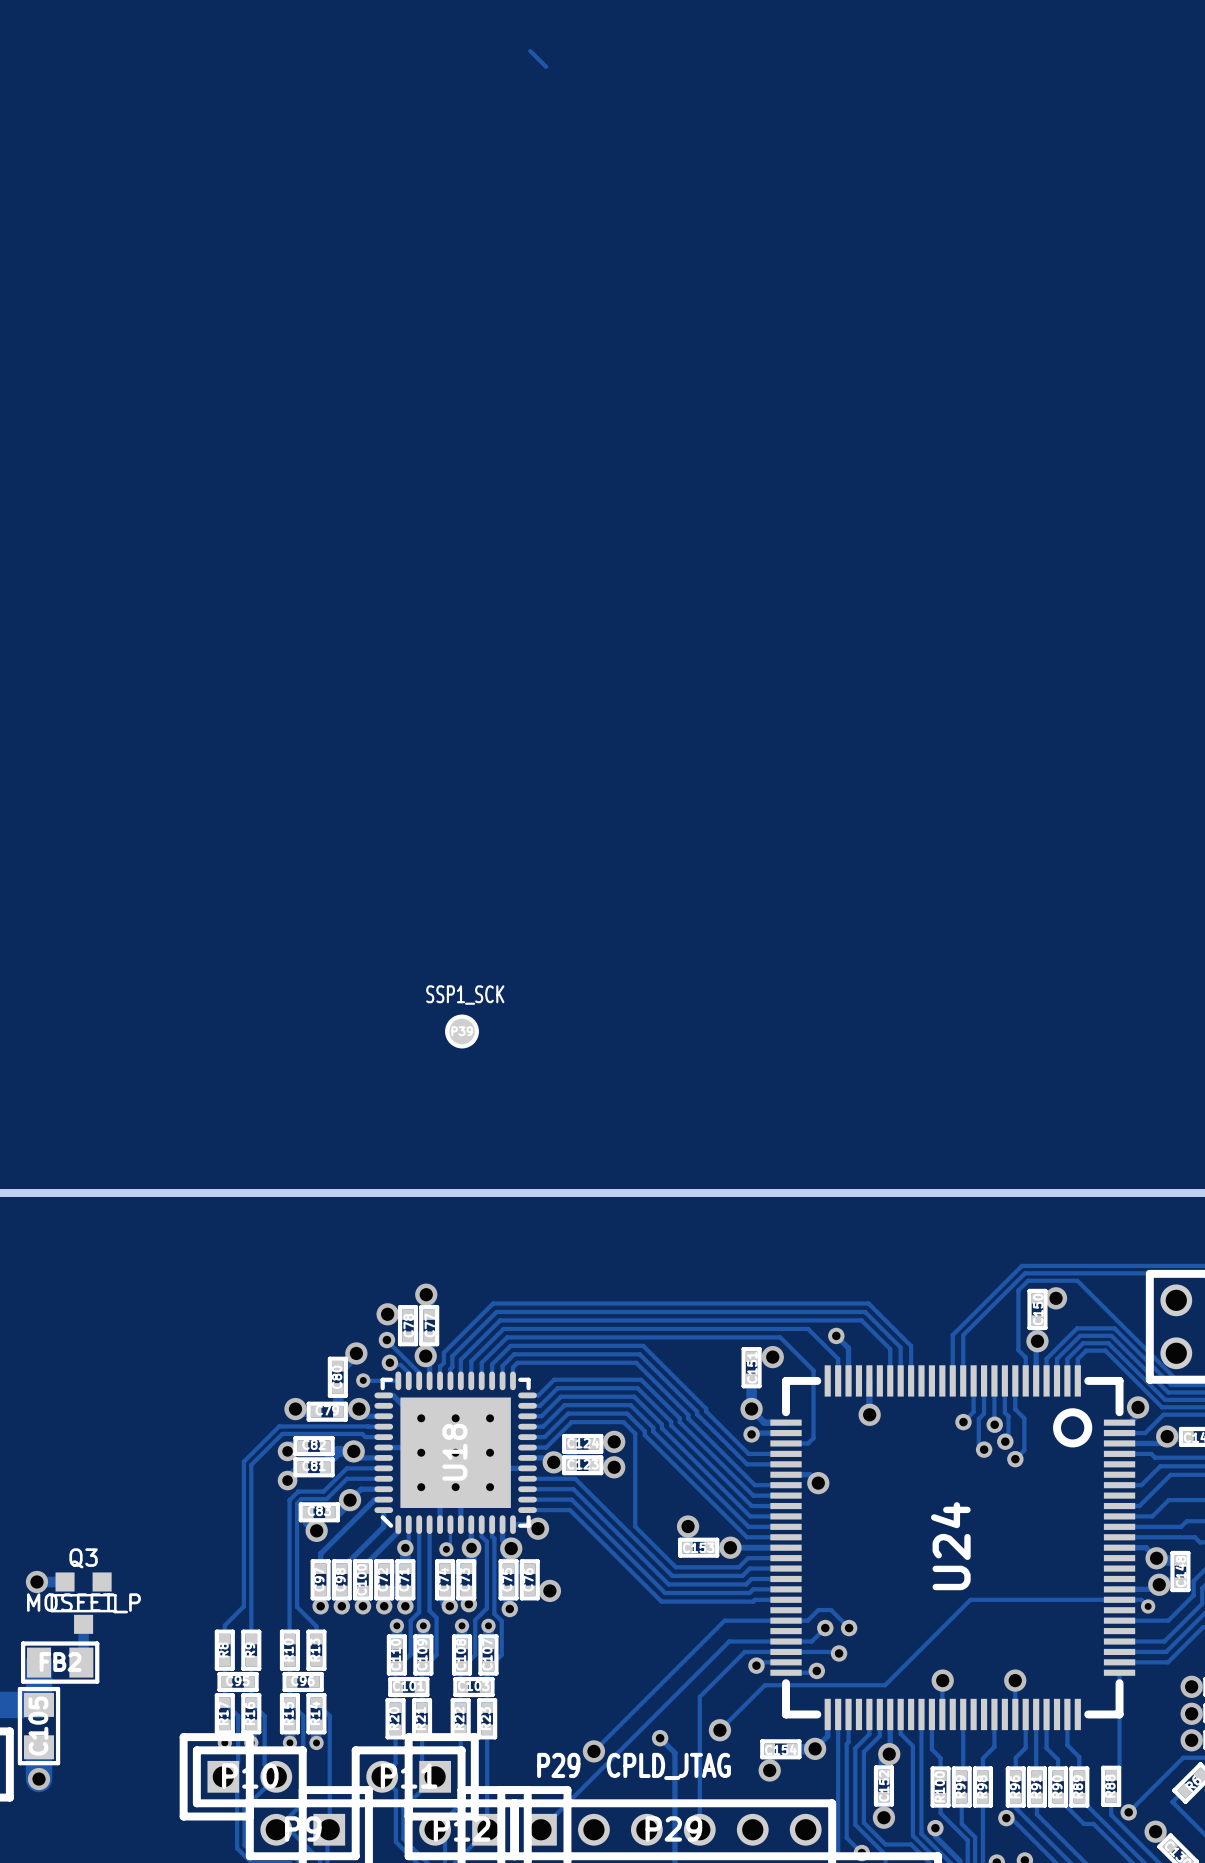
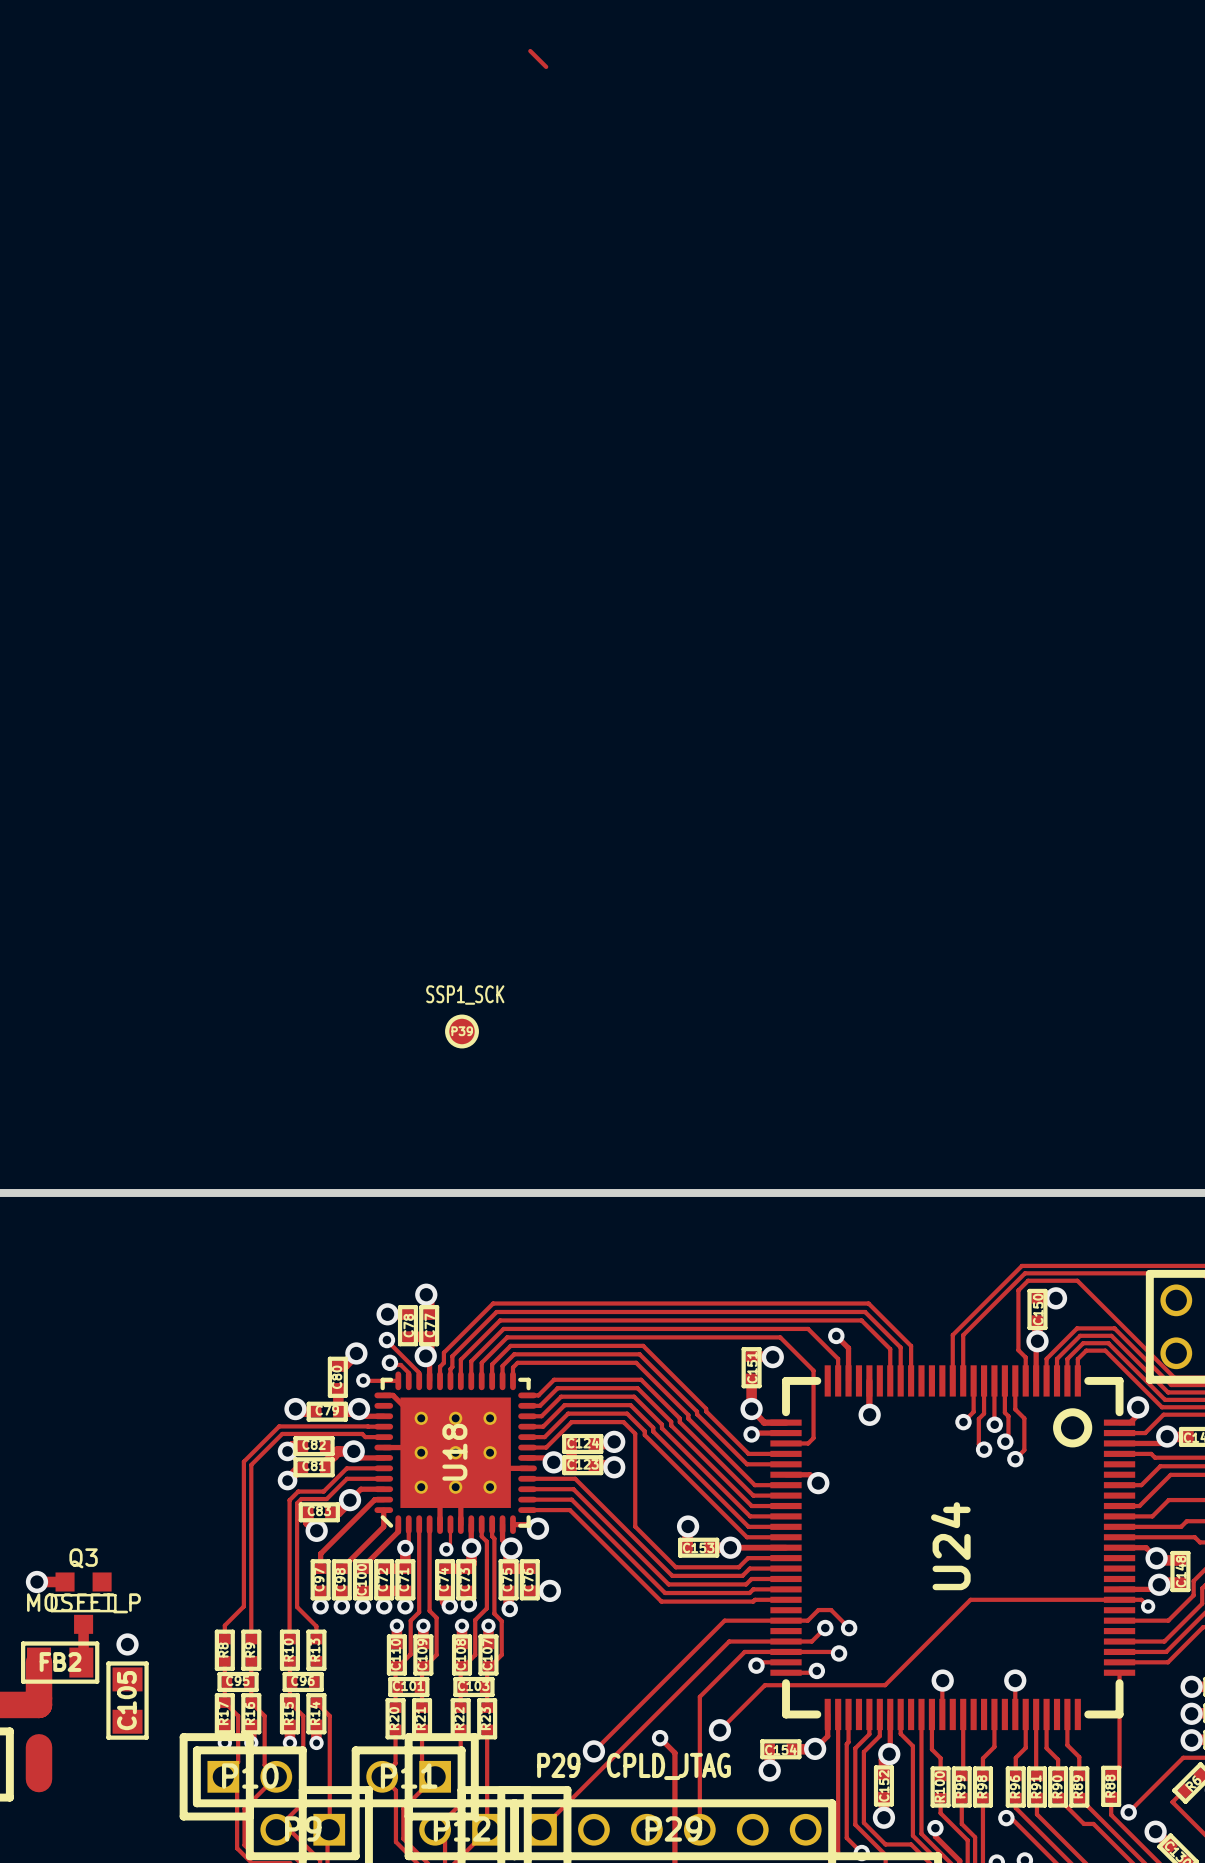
via: none -> (127, 1644)
C105 position: (39, 1726) -> (127, 1700)
via: (39, 1779) -> none

